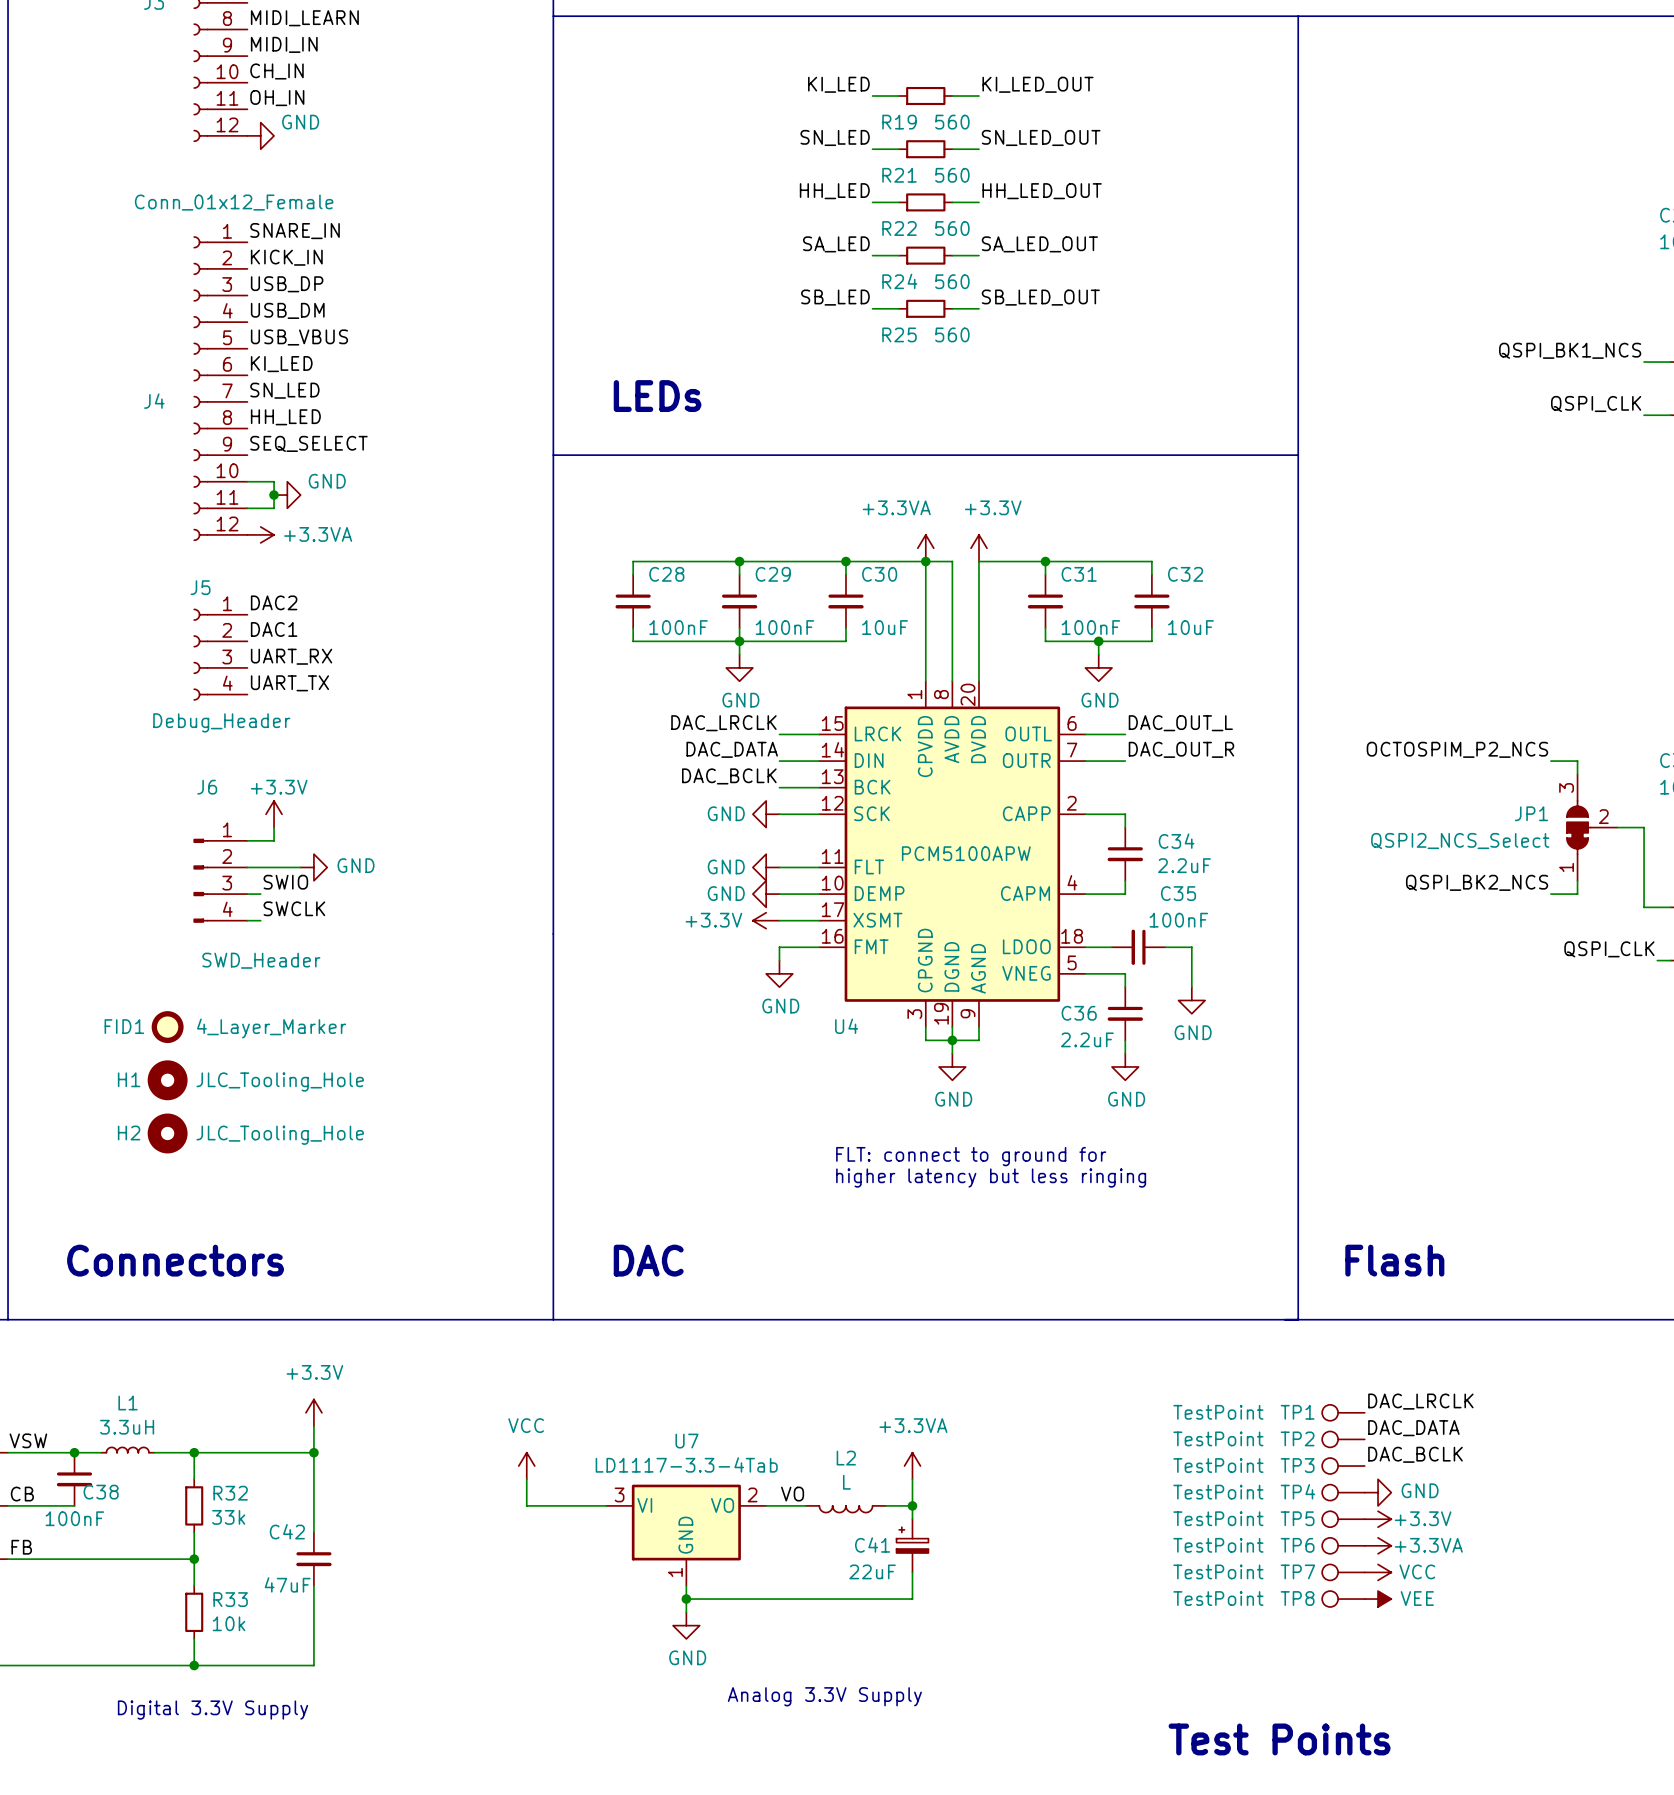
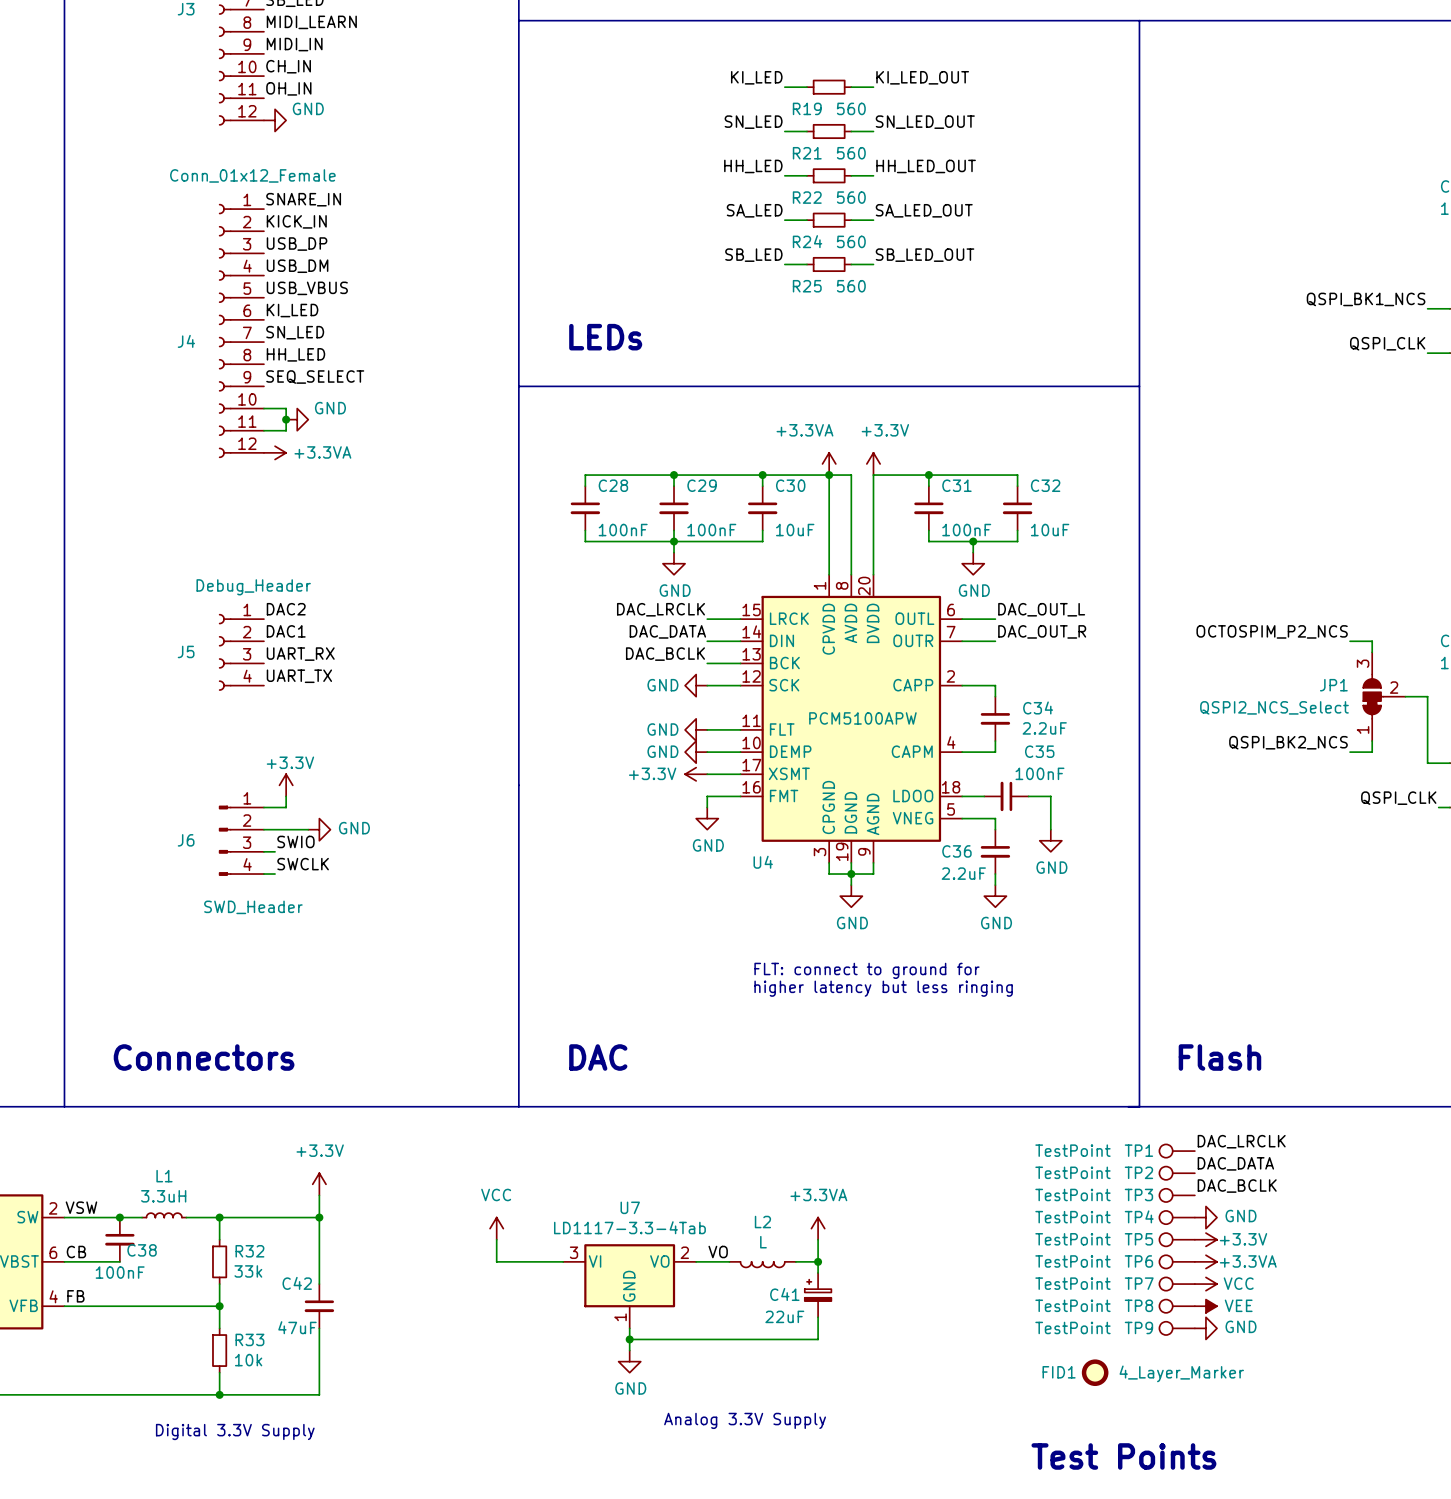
J5 name position: J5 (200, 587) -> J5 (186, 651)
label position: DAC2 (274, 602) -> DAC2 (286, 609)
label position: DAC1 (274, 629) -> DAC1 (286, 631)
J5 position: (220, 654) -> (241, 652)
label position: UART_RX (291, 656) -> UART_RX (300, 654)
label position: UART_TX (289, 683) -> UART_TX (299, 676)
J5 value position: Debug_Header (221, 722) -> Debug_Header (253, 587)
J6 name position: J6 (207, 787) -> J6 (186, 840)
power symbol position: +3.3V (274, 814) -> +3.3V (286, 785)
wire: (274, 827) (274, 840) (247, 840) -> (286, 796) (286, 807) (263, 807)
wire: (247, 867) (300, 867) -> (263, 829) (308, 829)
power symbol position: GND (313, 867) -> GND (319, 829)
J6 position: (220, 880) -> (241, 840)
label position: SWIO (285, 882) -> SWIO (295, 841)
wire: (247, 894) (260, 894) -> (263, 851) (275, 851)
label position: SWCLK (294, 908) -> SWCLK (303, 864)
wire: (247, 920) (260, 920) -> (263, 874) (275, 874)
J6 value position: SWD_Header (261, 960) -> SWD_Header (253, 907)
FID1 position: (167, 1027) -> (1095, 1372)
H1: JLC_Tooling_Hole (167, 1080) -> none
H2: JLC_Tooling_Hole (167, 1133) -> none
label position: DAC_LRCLK (1420, 1401) -> DAC_LRCLK (1241, 1141)
TP1 position: (1343, 1412) -> (1177, 1151)
label position: DAC_DATA (1413, 1428) -> DAC_DATA (1235, 1163)
TP2 position: (1343, 1439) -> (1177, 1173)
label position: DAC_BCLK (1415, 1454) -> DAC_BCLK (1237, 1186)
TP3 position: (1343, 1466) -> (1177, 1195)
TP4 position: (1343, 1492) -> (1177, 1217)
power symbol position: GND (1378, 1492) -> GND (1205, 1217)
TP5 position: (1343, 1519) -> (1177, 1239)
power symbol position: +3.3V (1378, 1519) -> +3.3V (1205, 1239)
TP6 position: (1343, 1545) -> (1177, 1261)
power symbol position: +3.3VA (1378, 1545) -> +3.3VA (1205, 1261)
TP7 position: (1343, 1572) -> (1177, 1284)
power symbol position: VCC (1378, 1572) -> VCC (1205, 1284)
TP9: none -> TestPoint (1177, 1328)
power symbol: none -> GND (1205, 1328)
TP8 position: (1343, 1599) -> (1177, 1306)
power symbol position: VEE (1378, 1599) -> VEE (1205, 1306)

